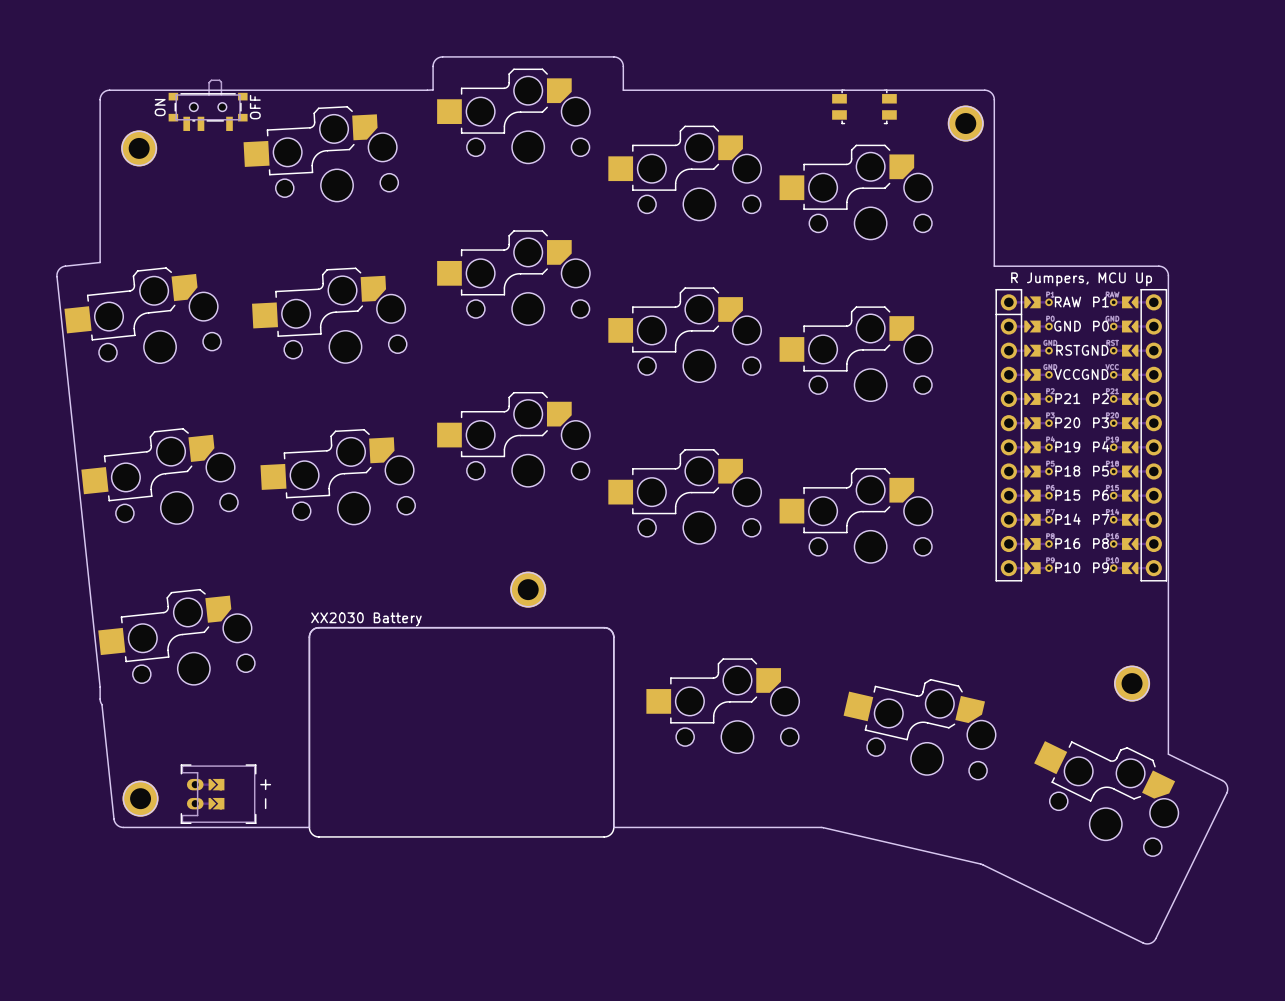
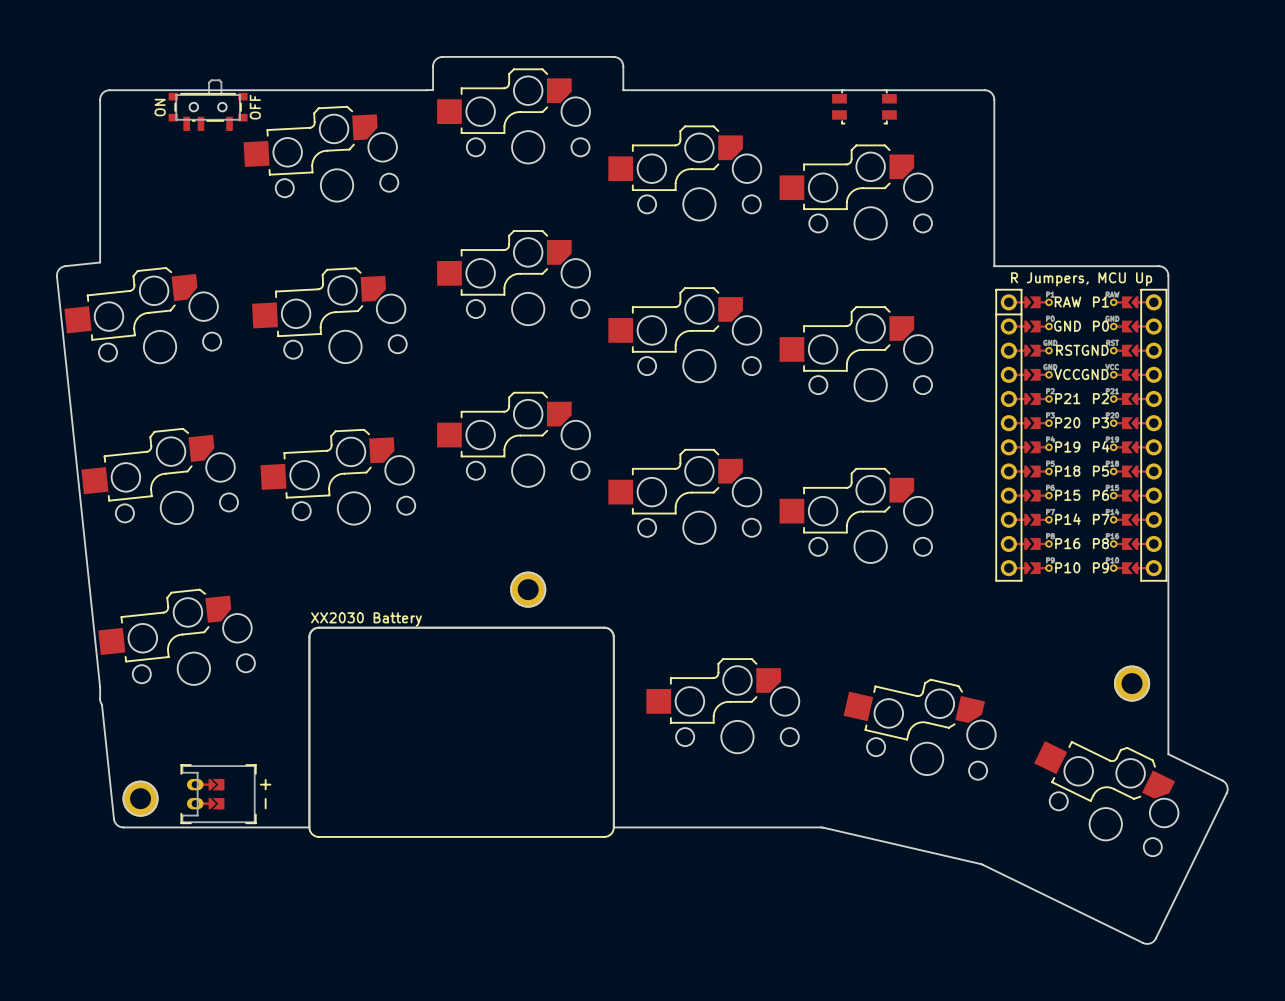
round board edge: [947, 105, 984, 142] -> none
part: (965, 123) -> none
round board edge: [121, 130, 157, 167] -> none
part: (139, 148) -> none

